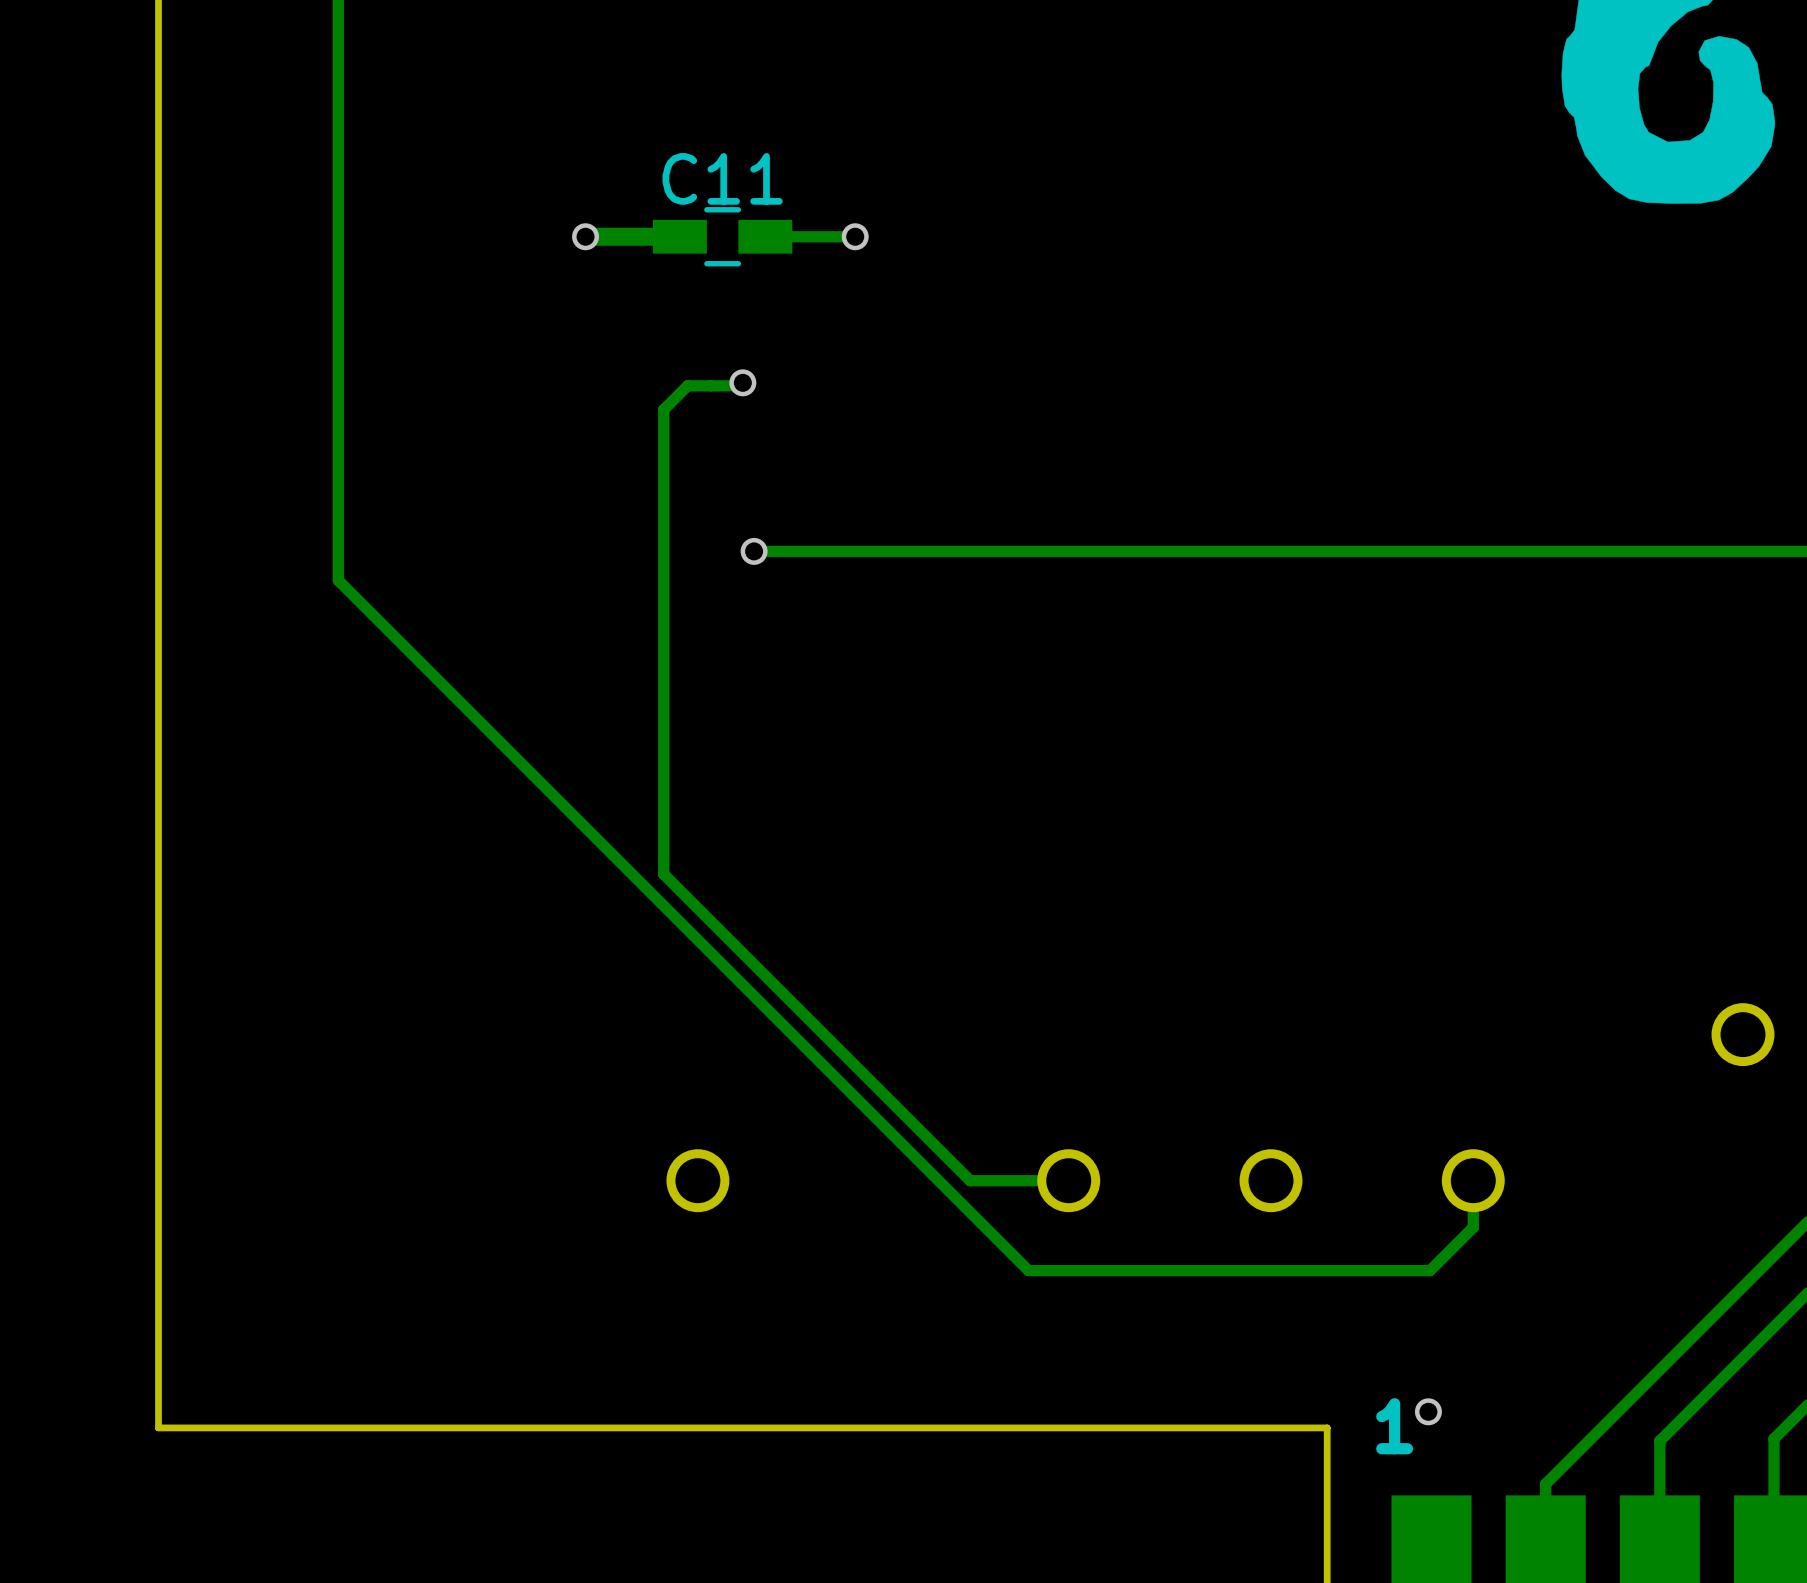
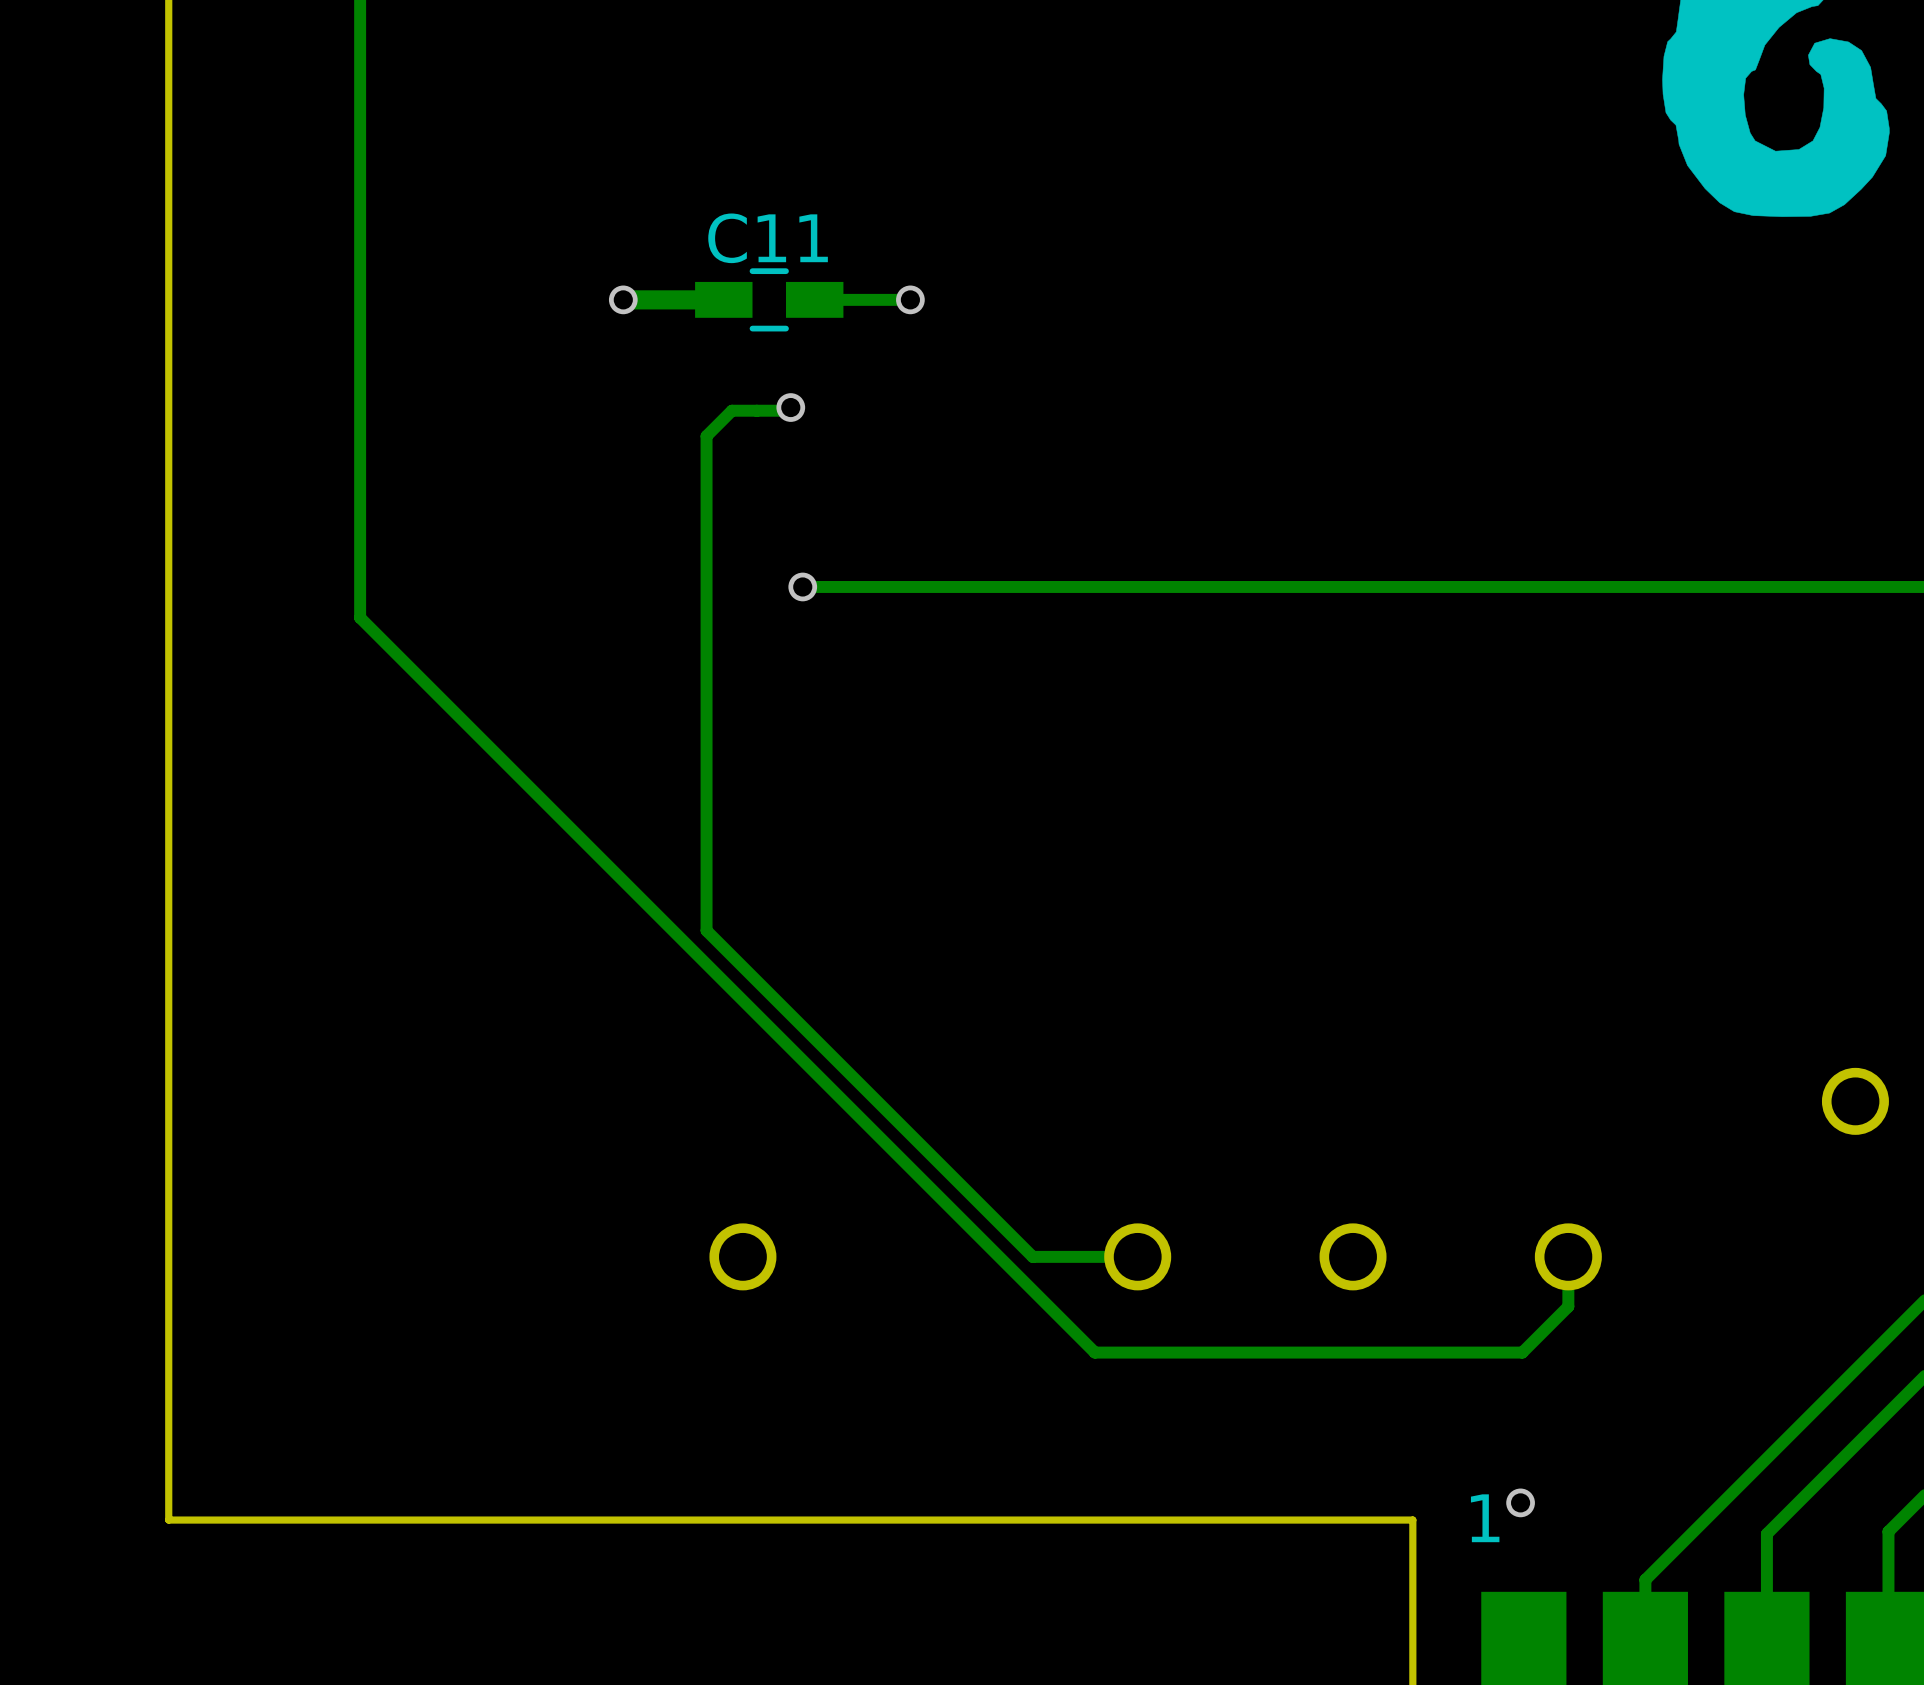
via position: (585, 236) -> (623, 299)
track: (679, 236) (585, 236) -> (723, 299) (623, 299)
C11 position: (722, 236) -> (769, 299)
track: (855, 236) (765, 236) -> (910, 299) (814, 299)
via position: (855, 236) -> (910, 299)

